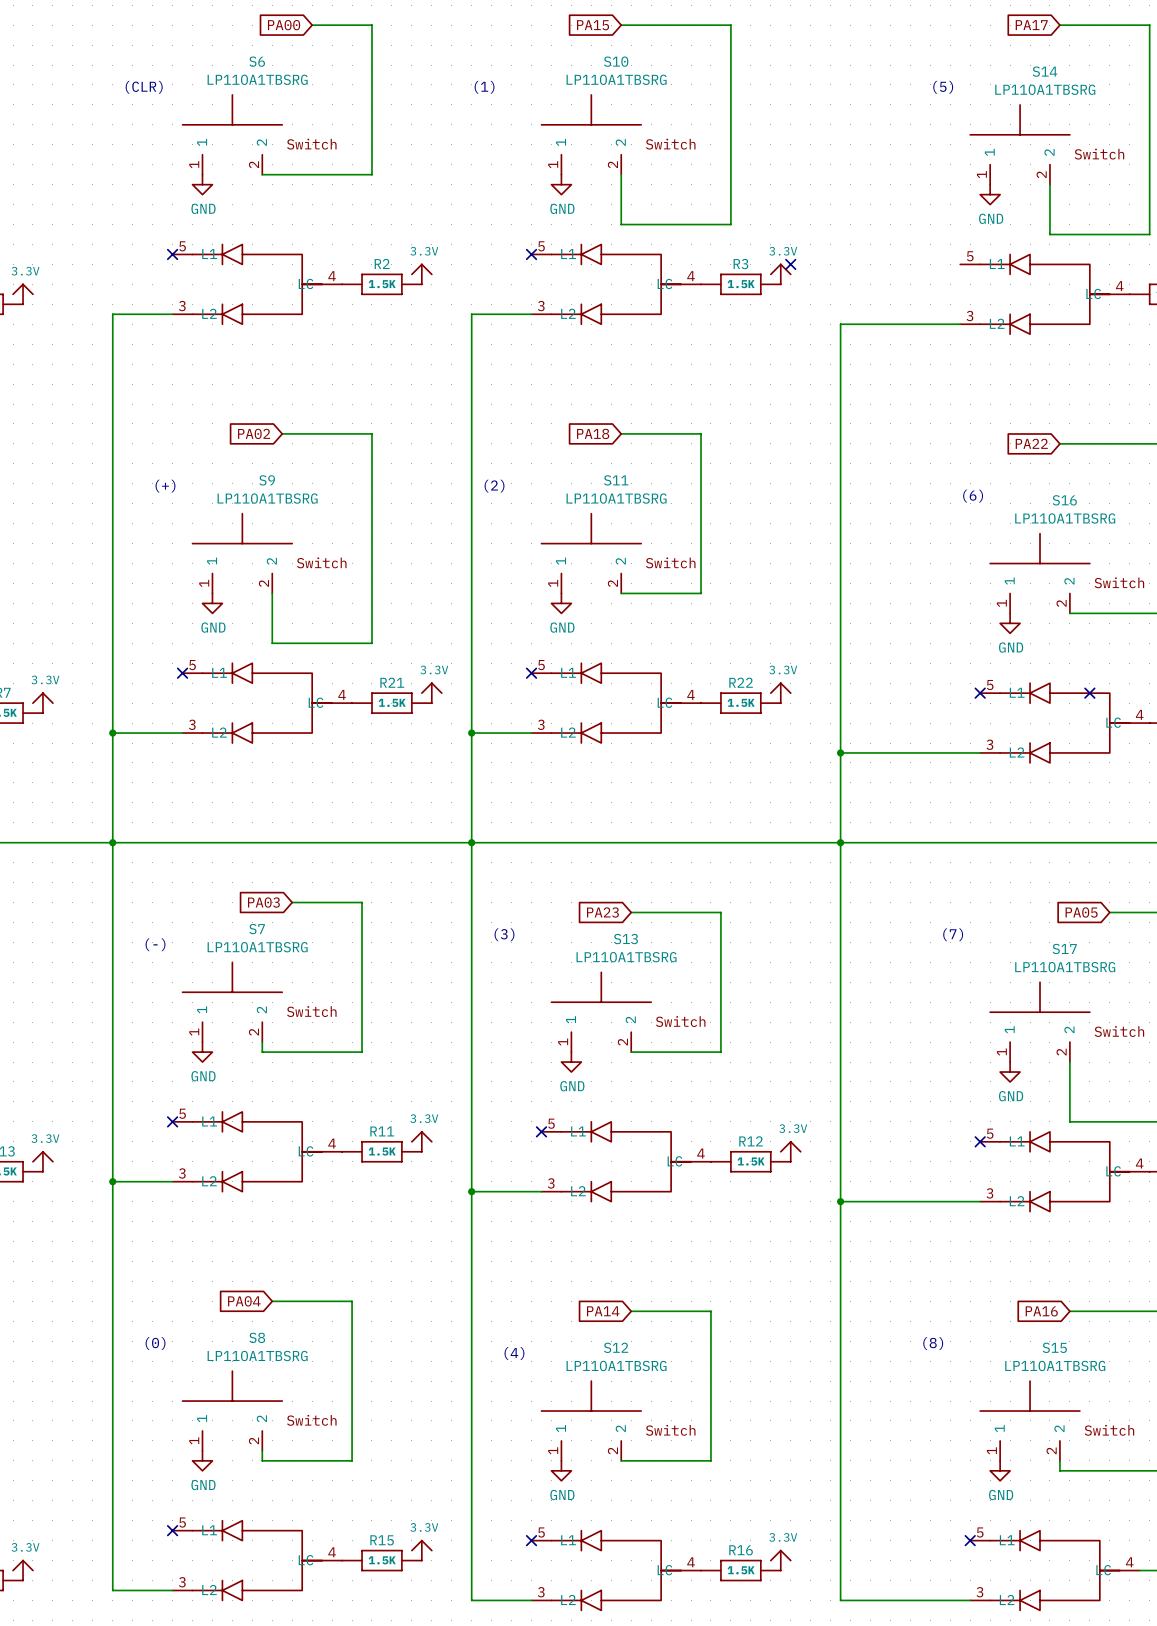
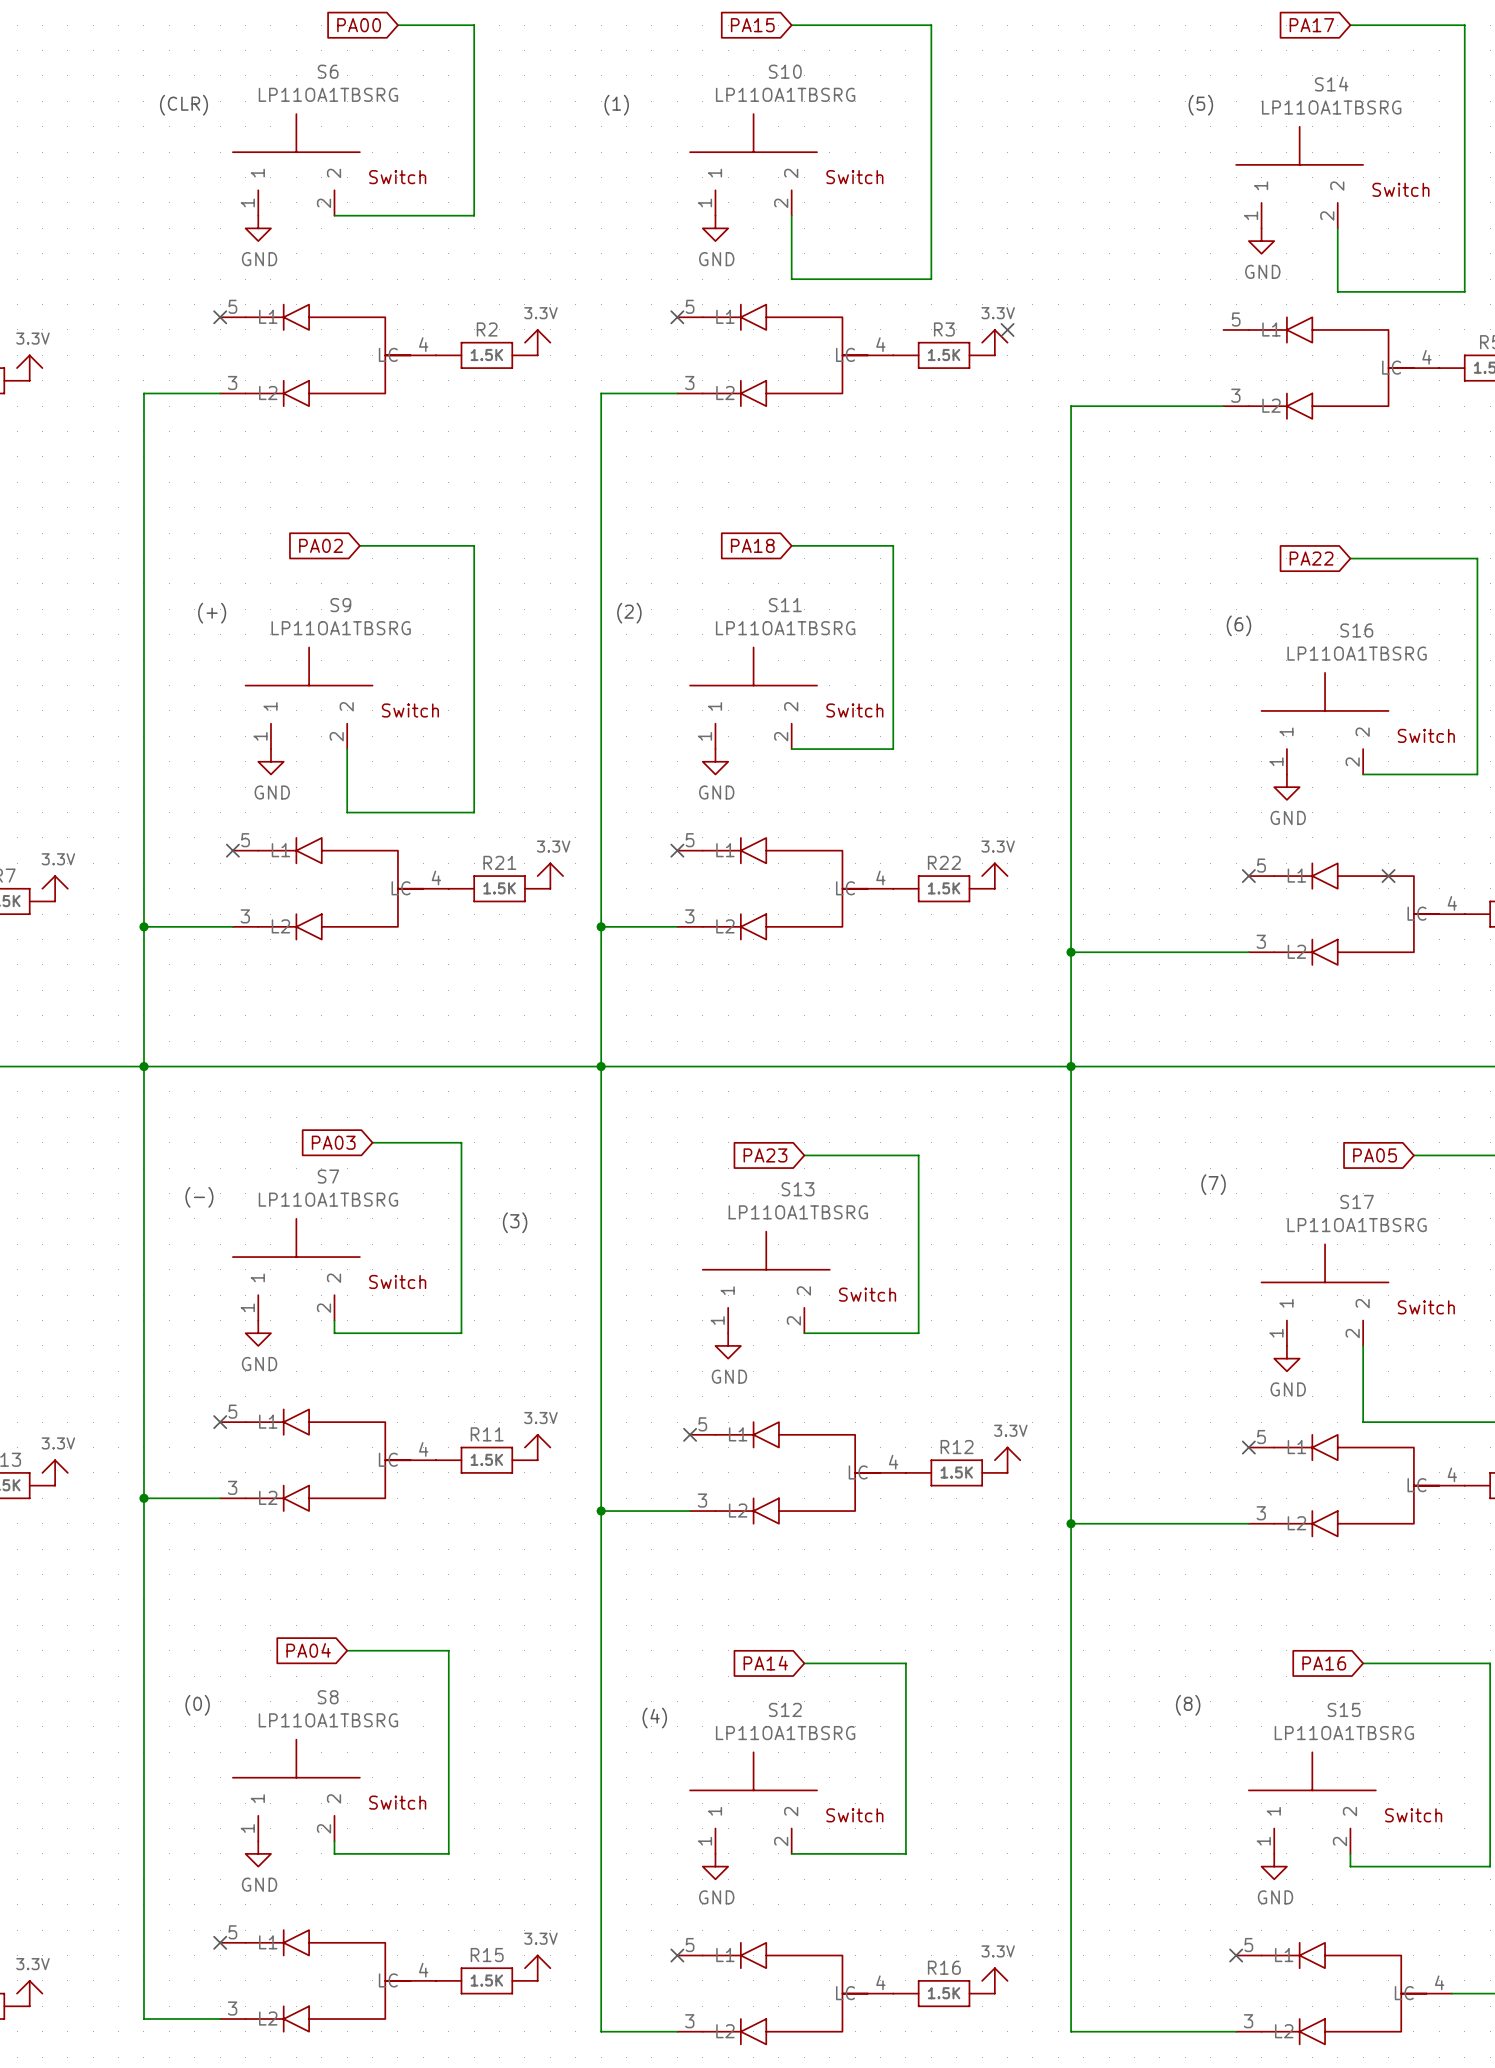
text position: (3) (504, 934) -> (3) (515, 1222)

